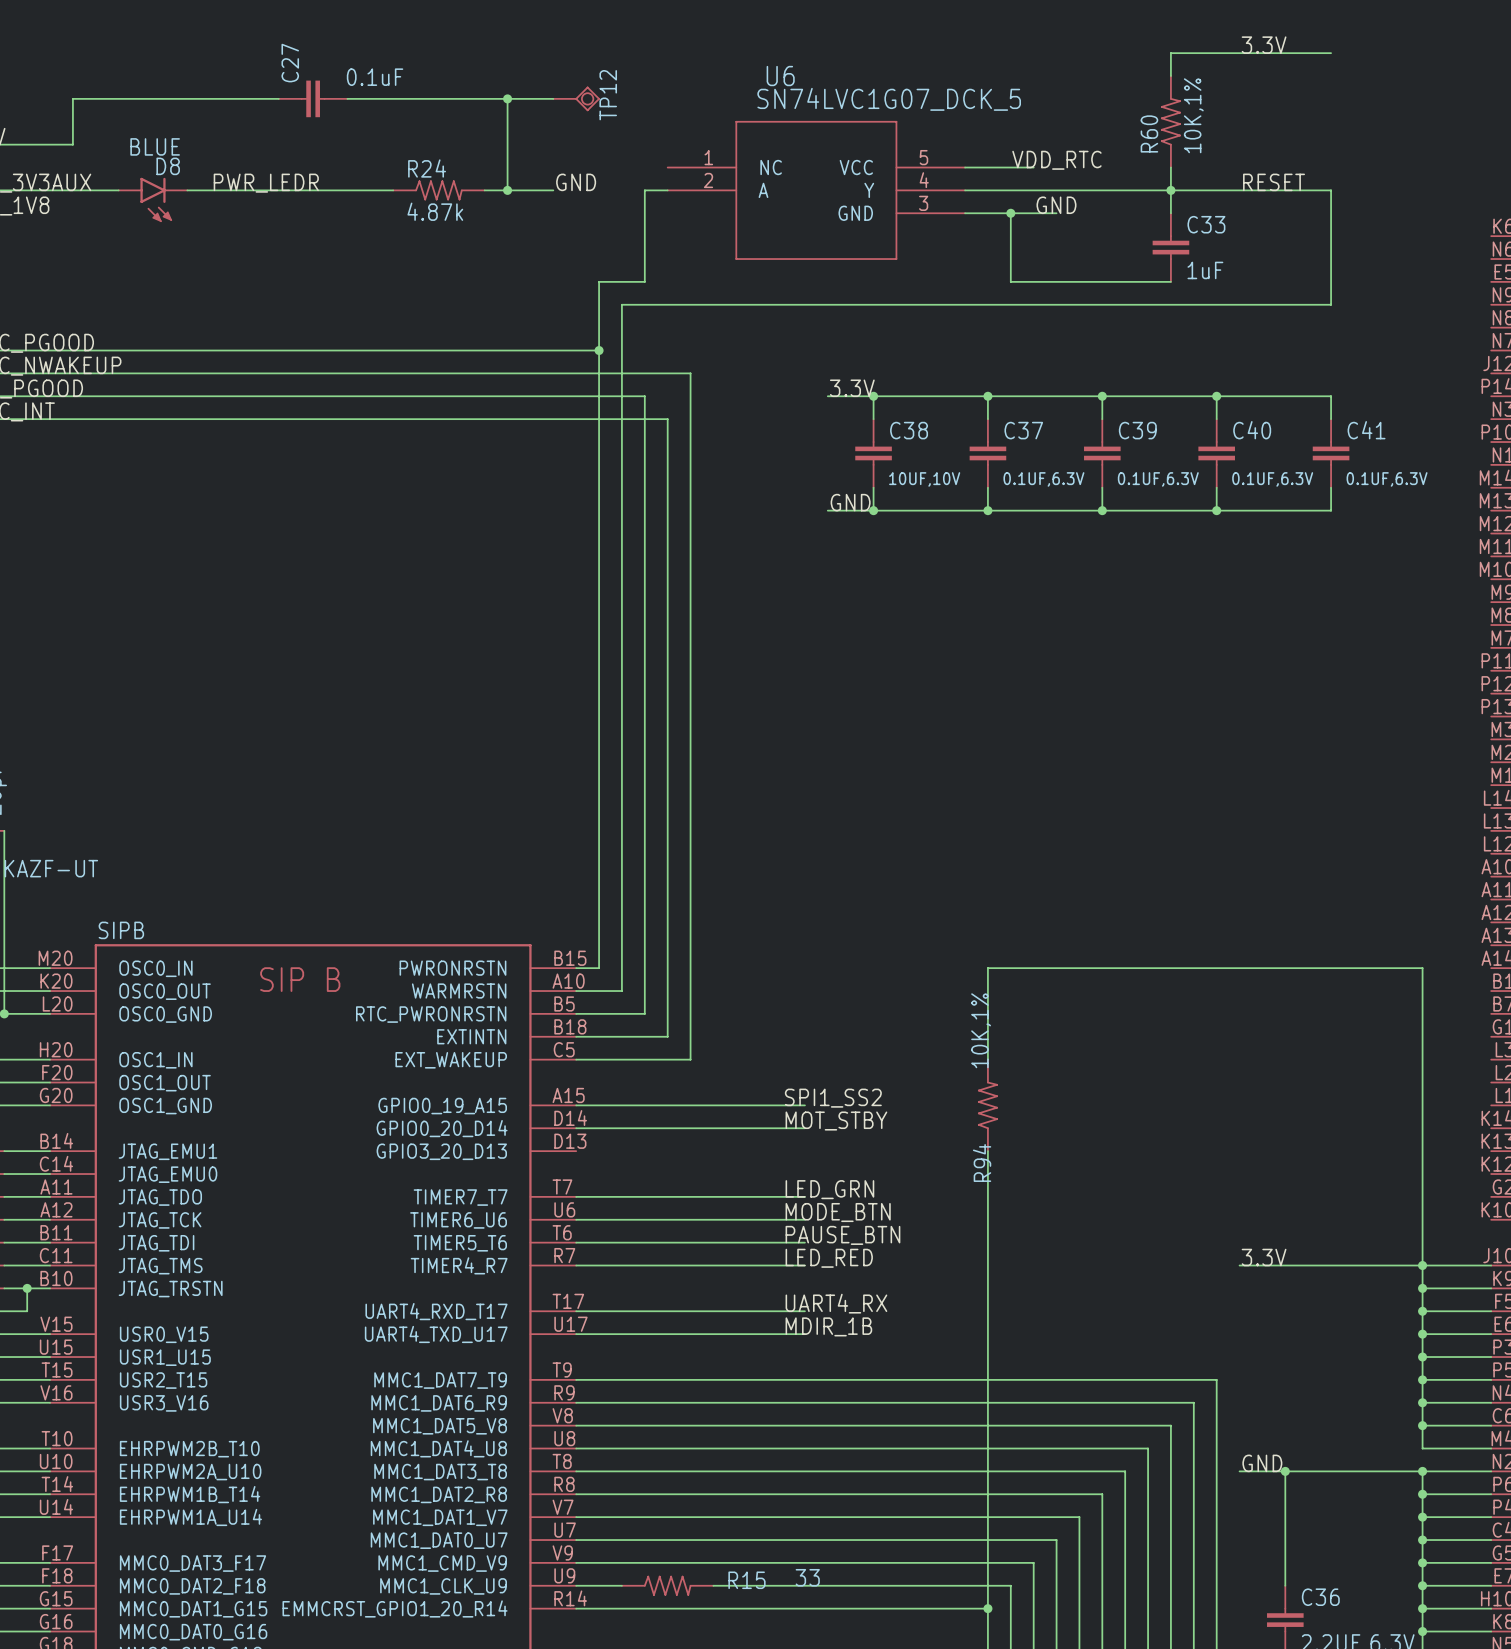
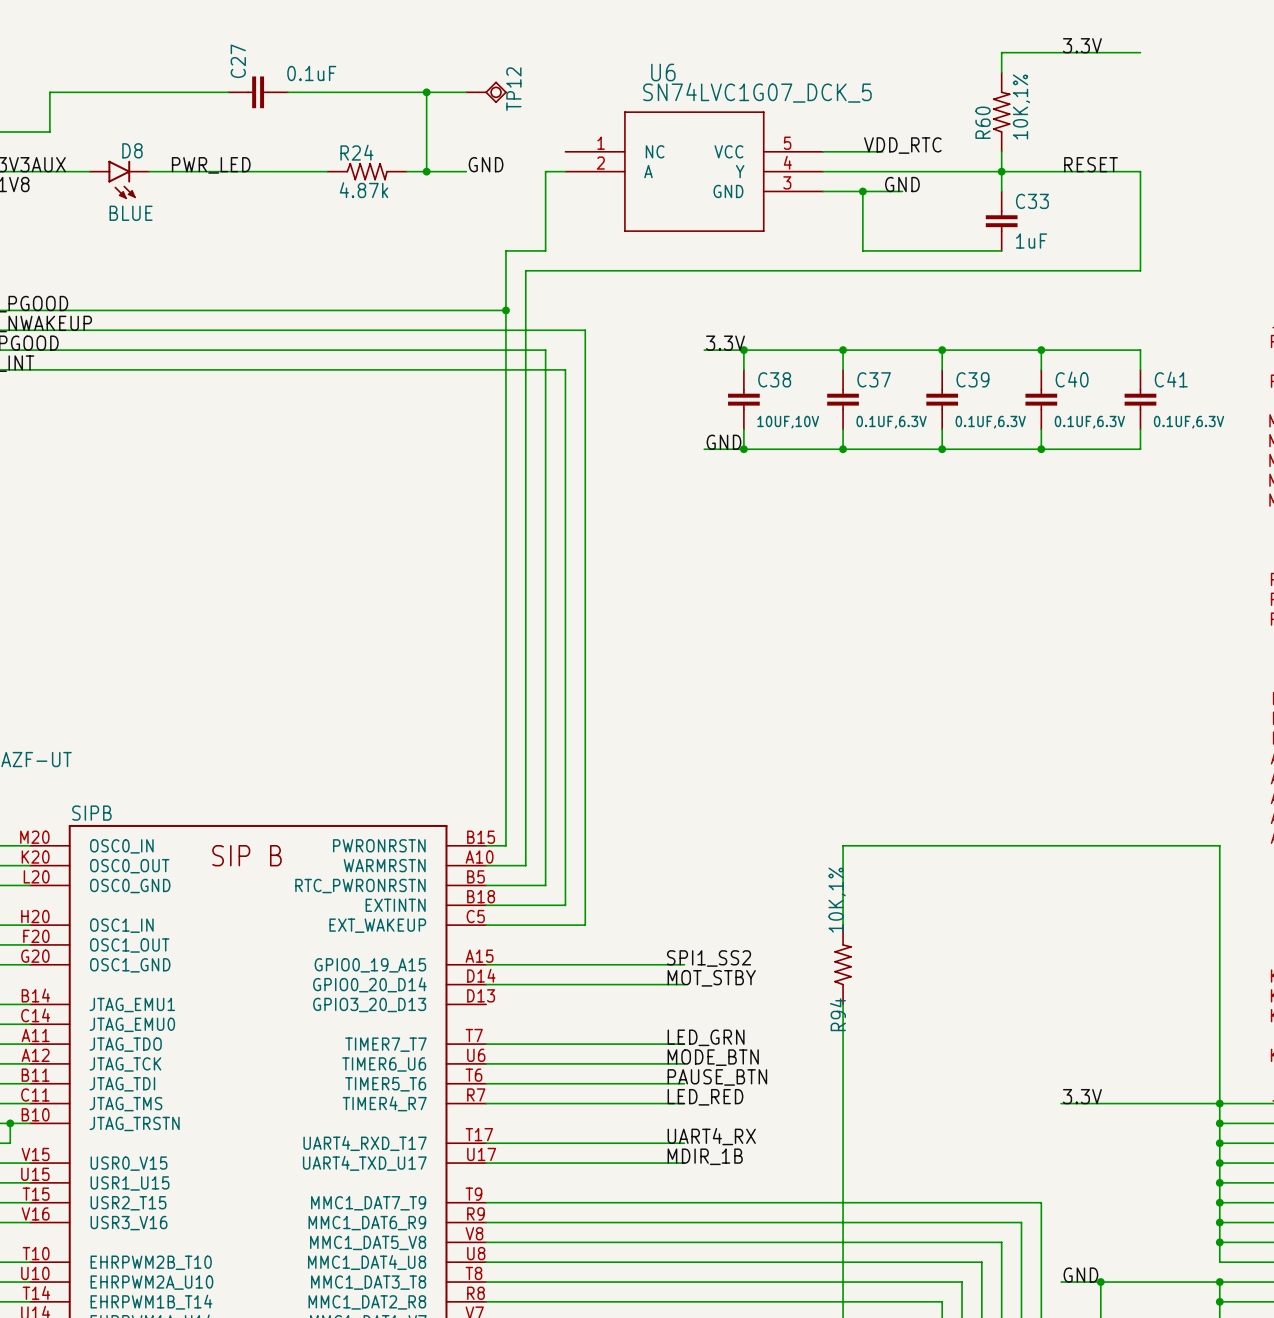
D8 value position: BLUE (155, 146) -> BLUE (131, 213)
label: PWR_LEDR (266, 183) -> PWR_LED (211, 165)

